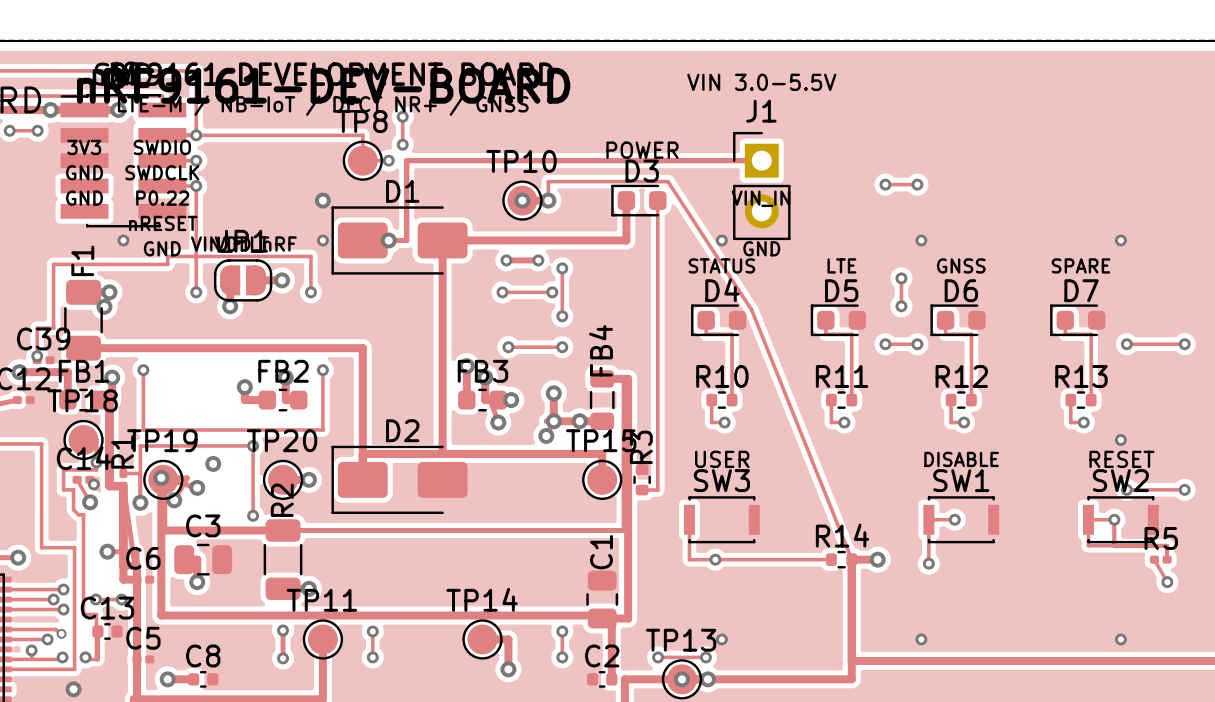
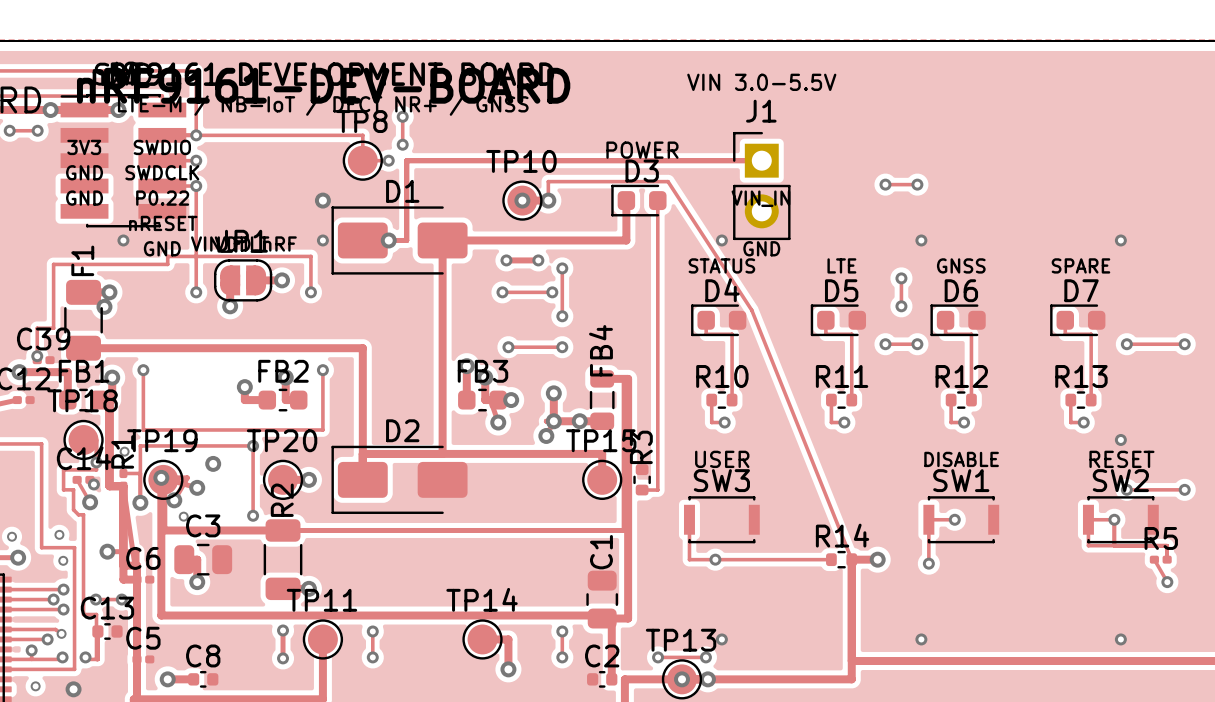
via: none -> (124, 451)
via: none -> (183, 516)
via: none -> (59, 534)
via: none -> (12, 536)
via: none -> (63, 560)
via: none -> (35, 686)

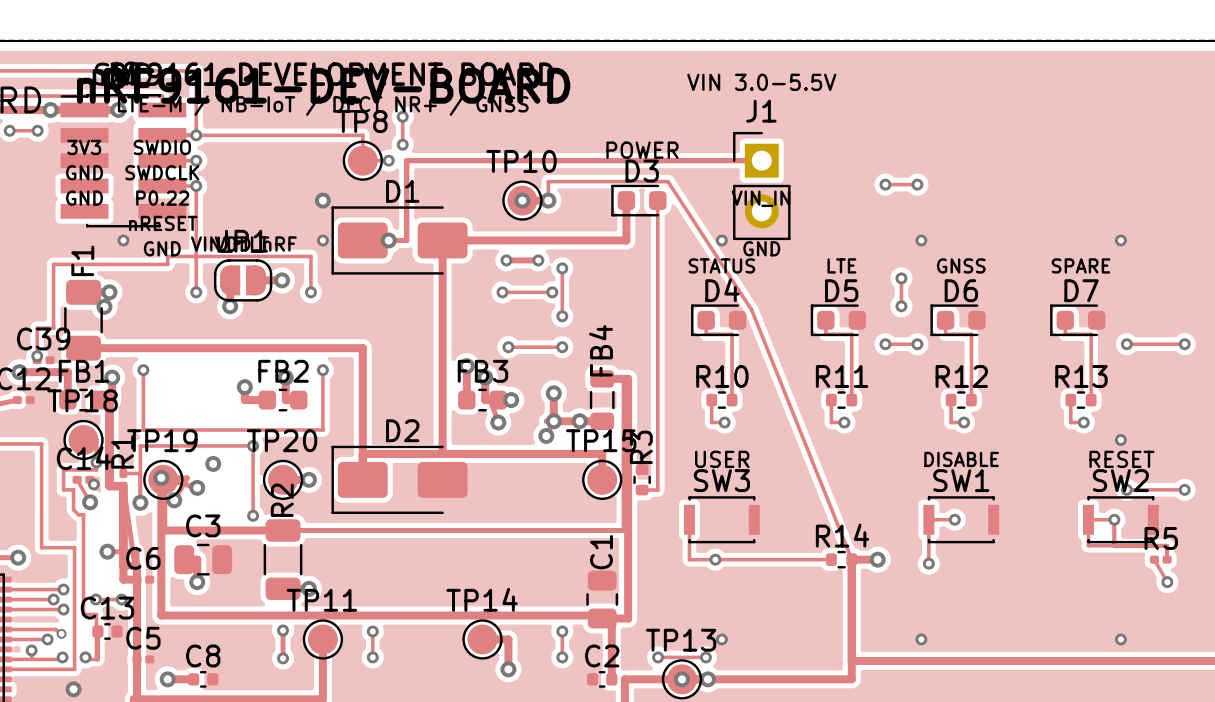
via: (124, 451) -> none
via: (183, 516) -> none
via: (59, 534) -> none
via: (12, 536) -> none
via: (63, 560) -> none
via: (35, 686) -> none

